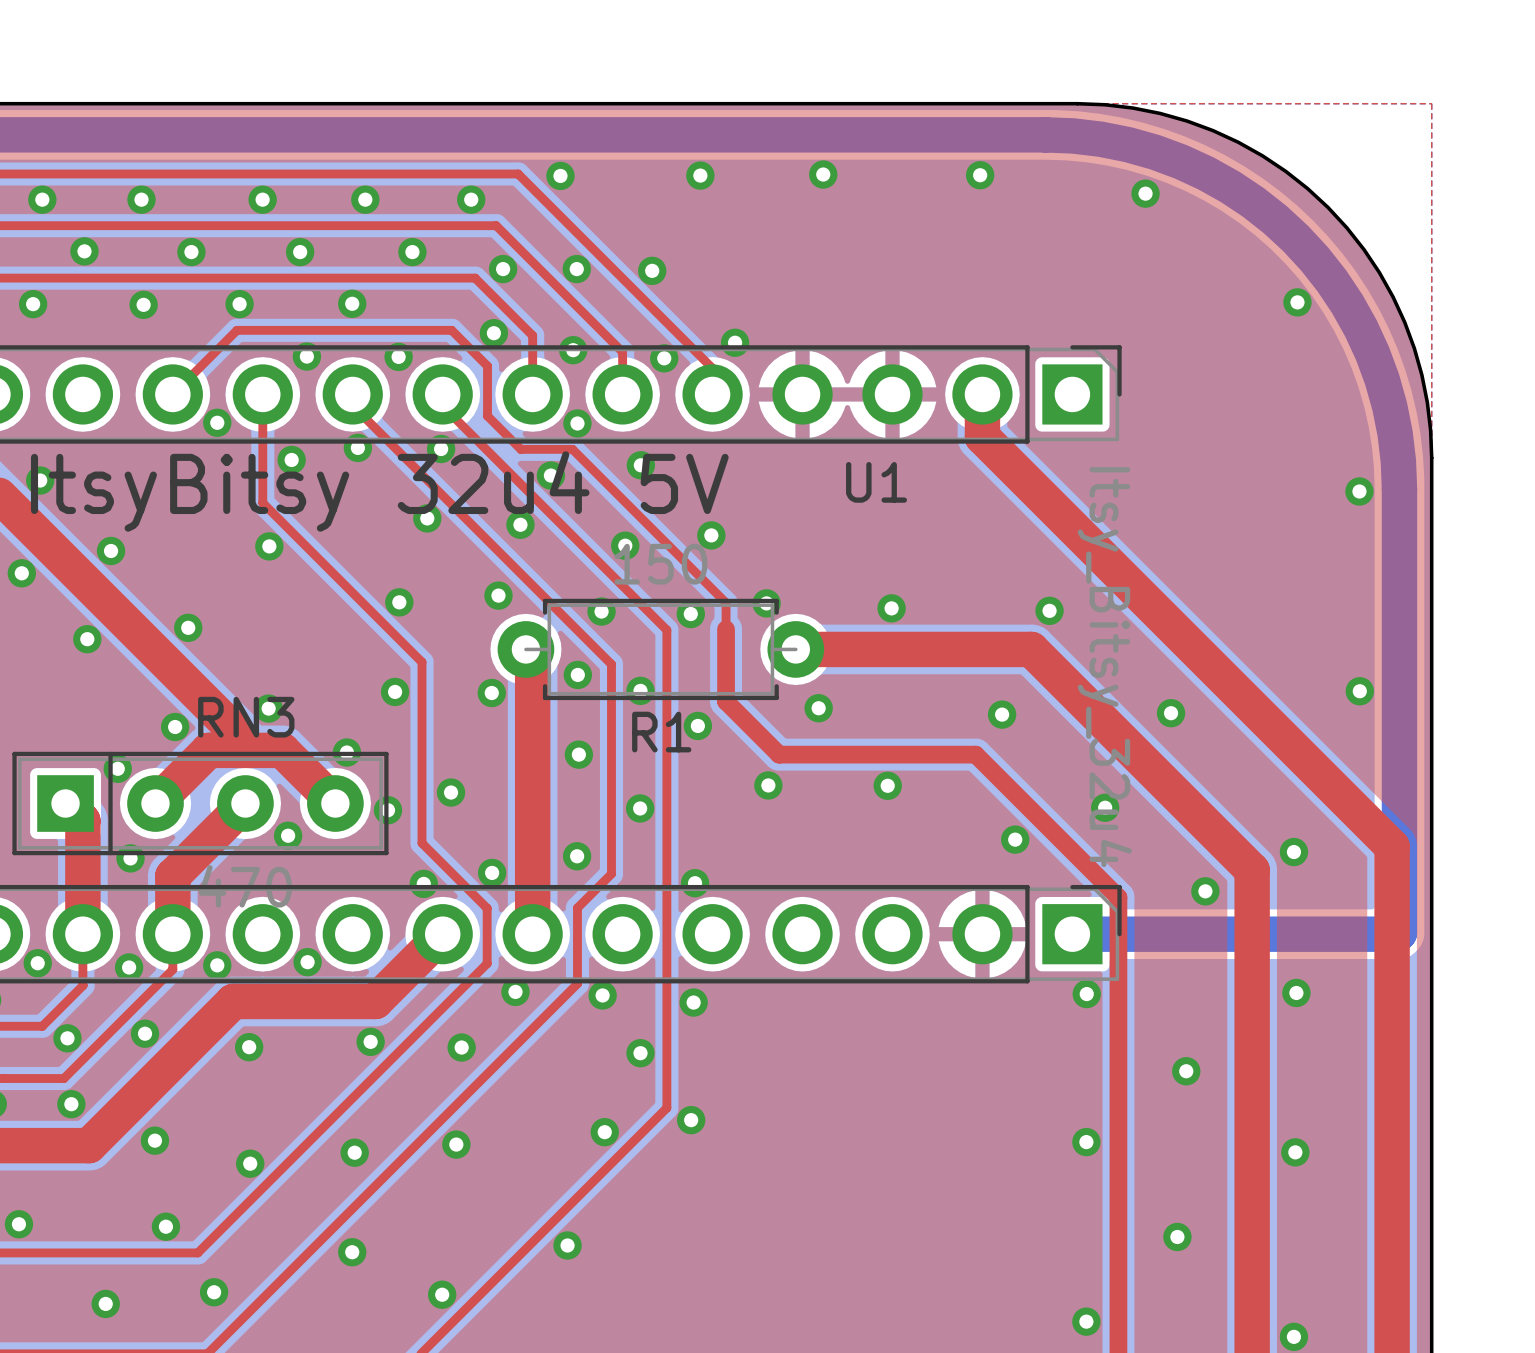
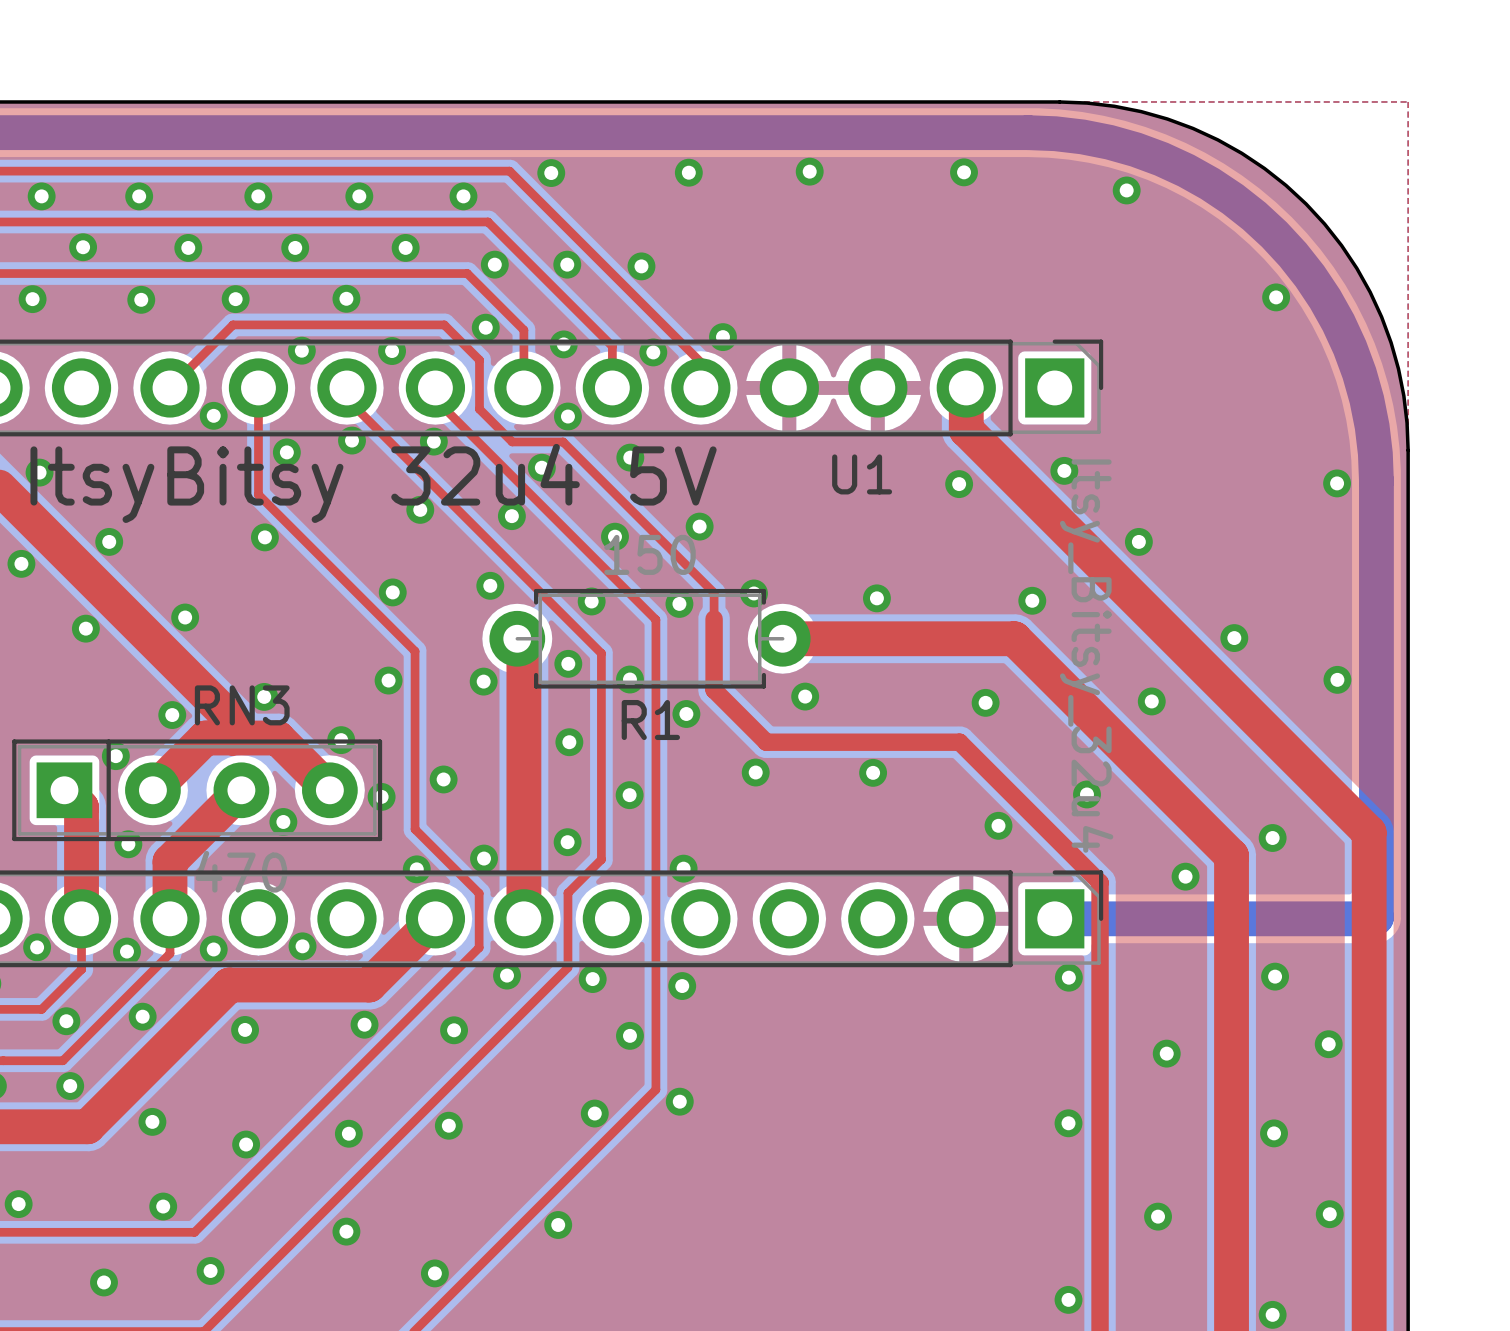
via: none -> (1064, 470)
via: none -> (959, 484)
via: none -> (1138, 541)
via: none -> (1234, 638)
via: none -> (1328, 1044)
via: none -> (1329, 1214)

